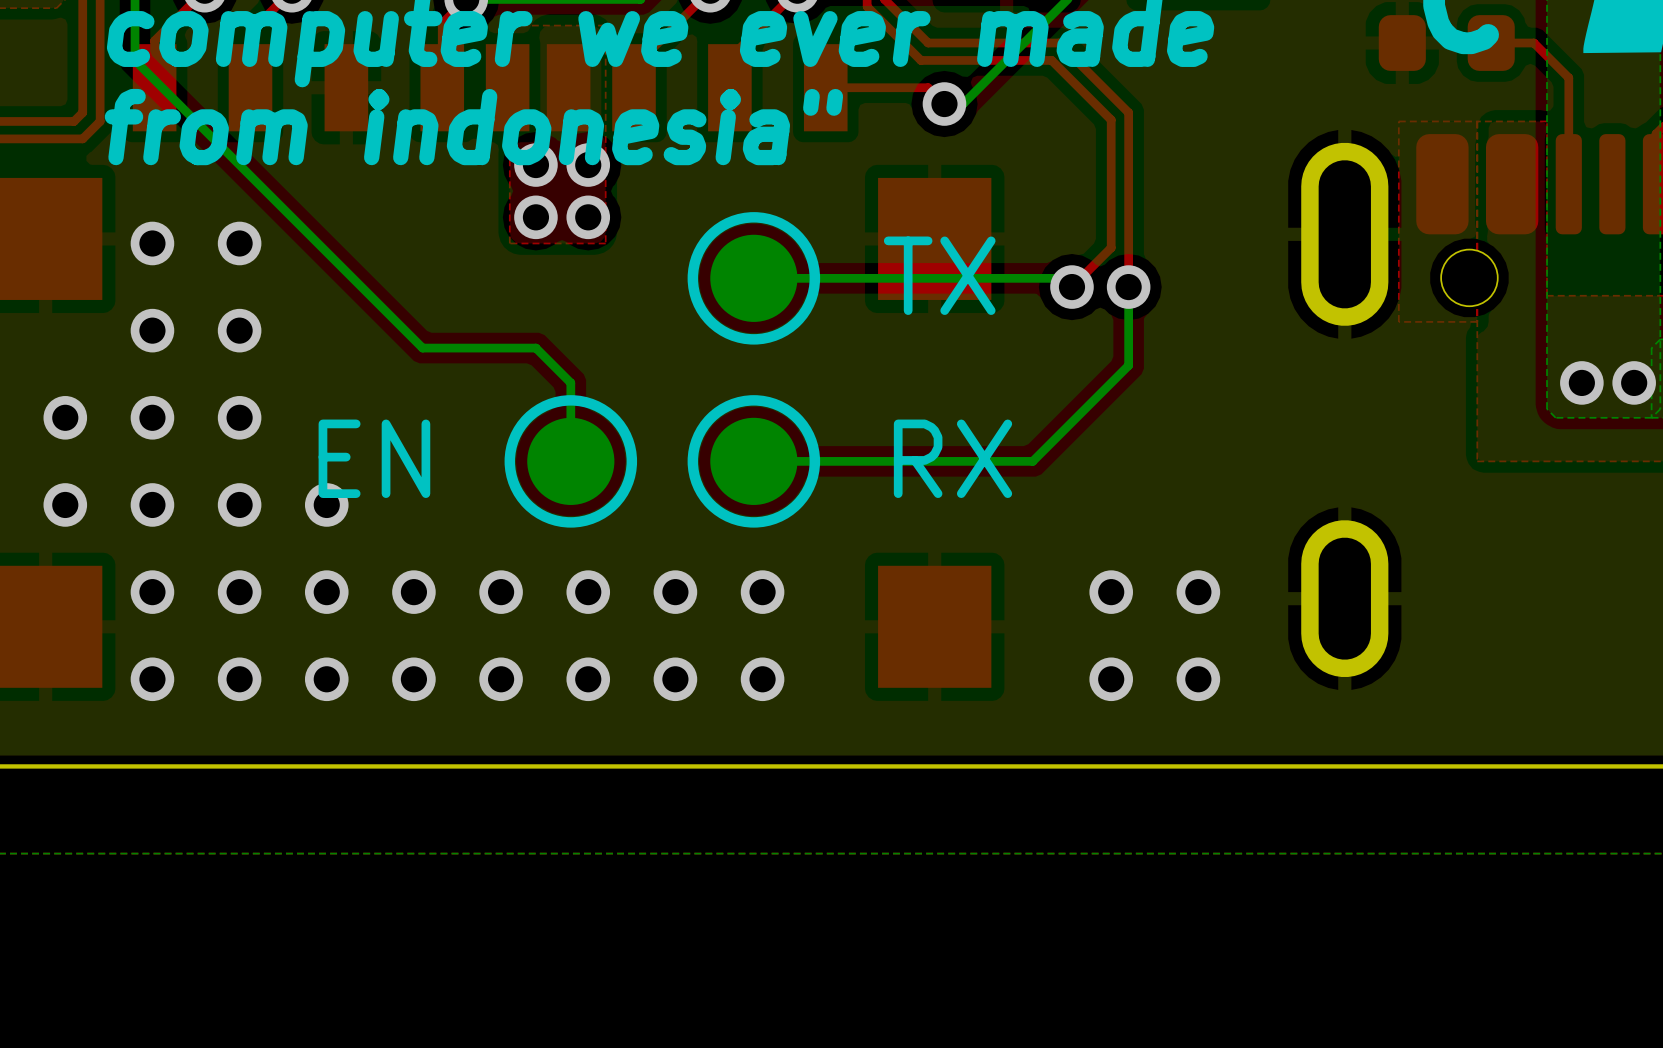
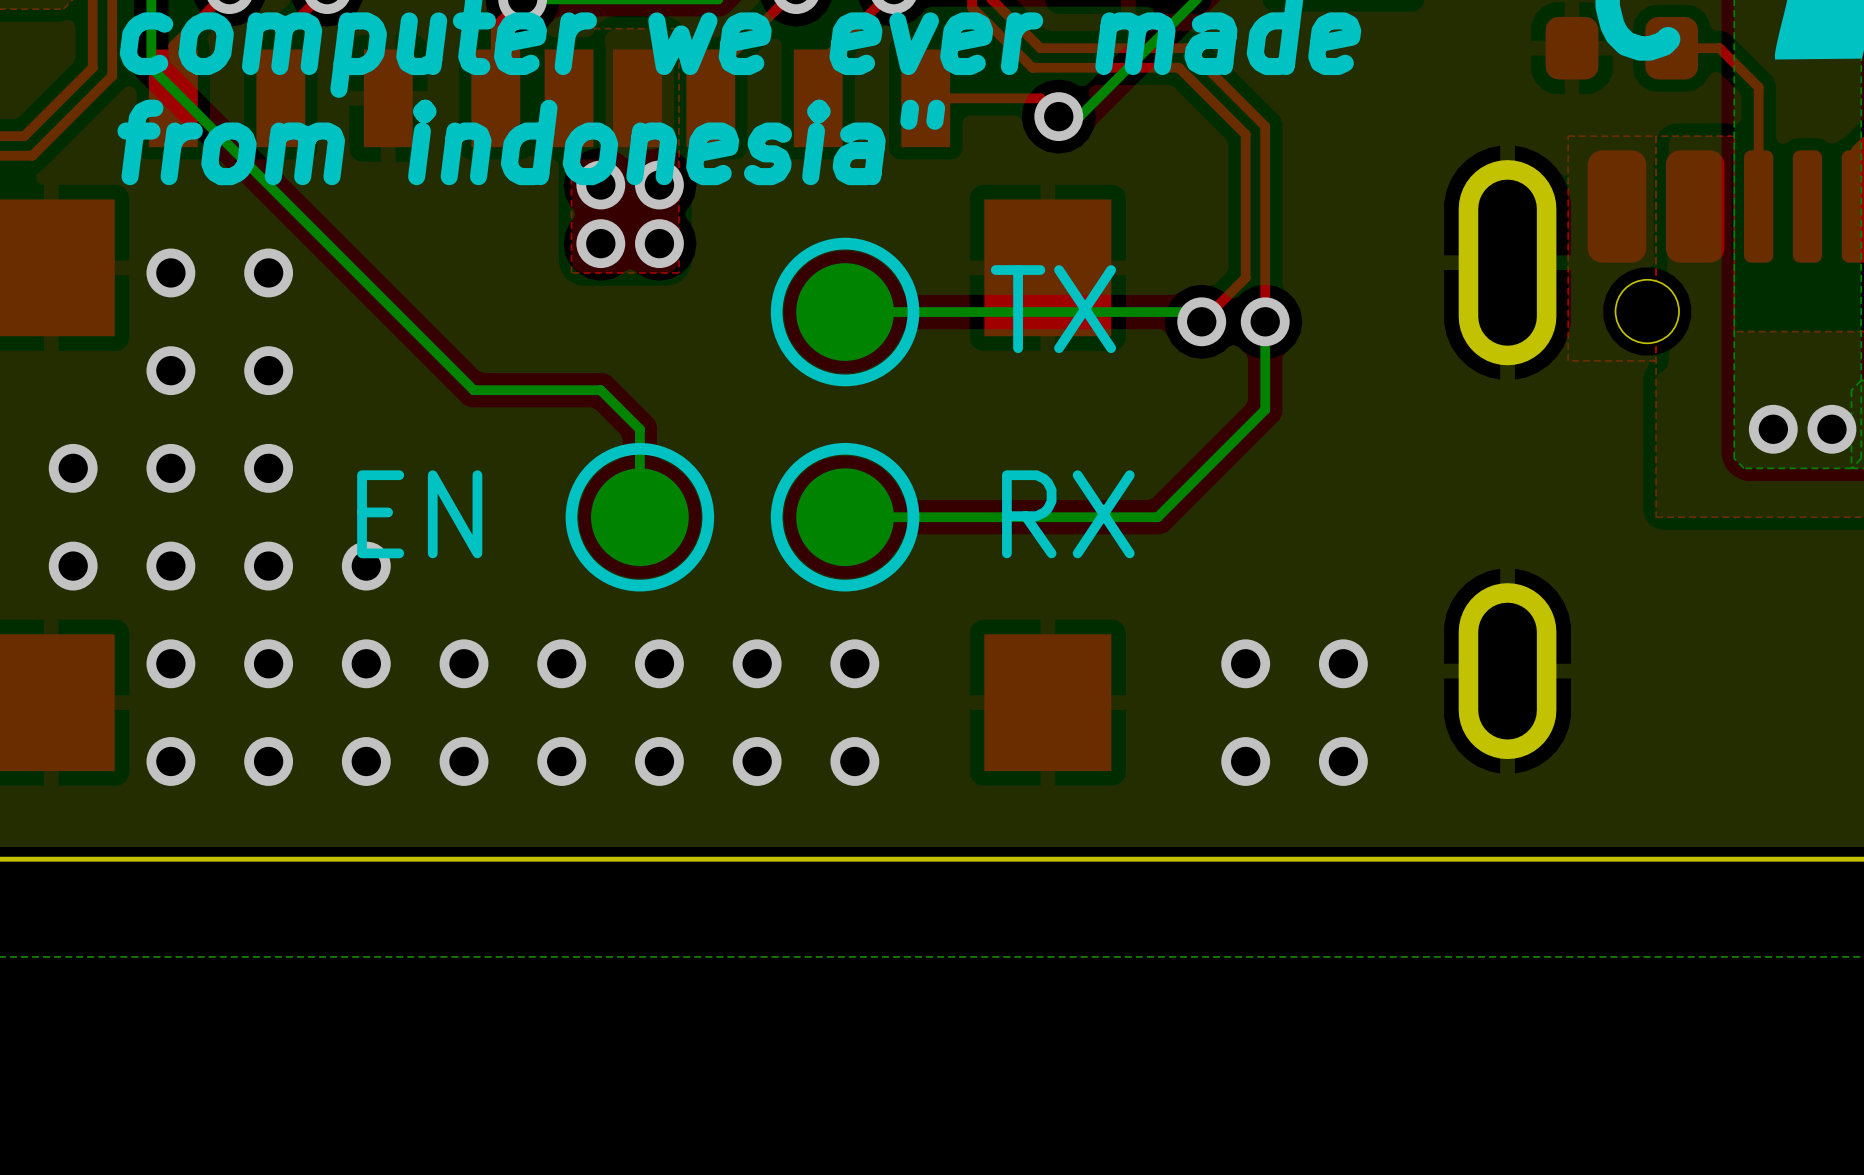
top track: (82, 60) (82, 112) (74, 121) (21, 121) -> (92, 67) (24, 136)
top track: (100, 67) (100, 121) (82, 138) (28, 138) -> (112, 75) (32, 155)

